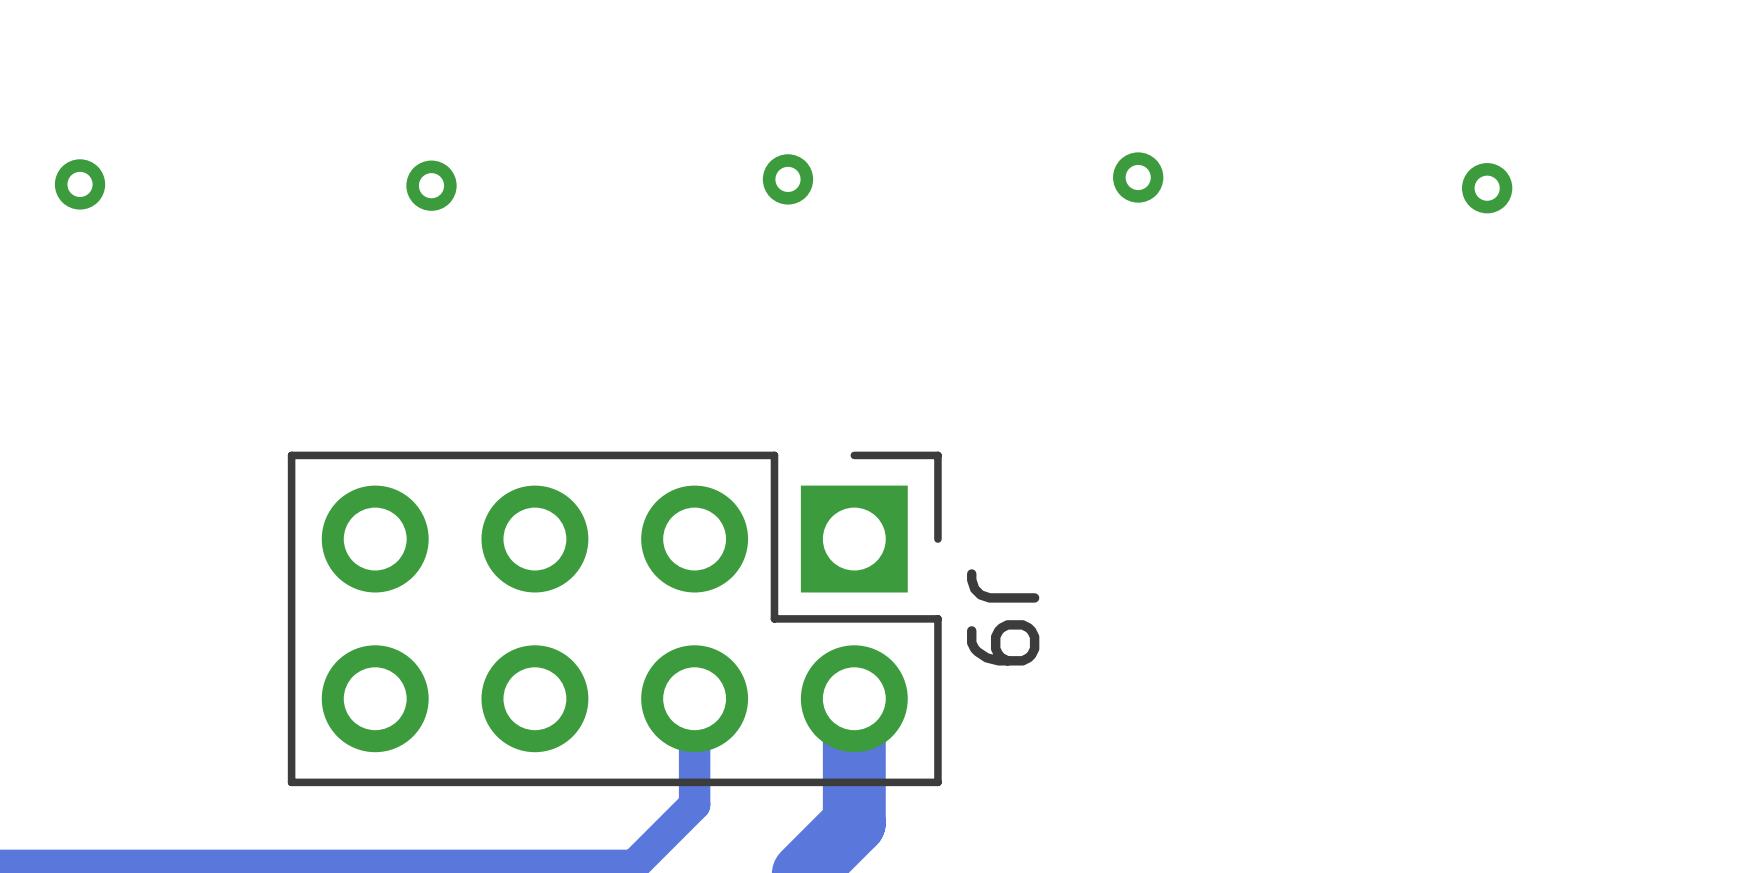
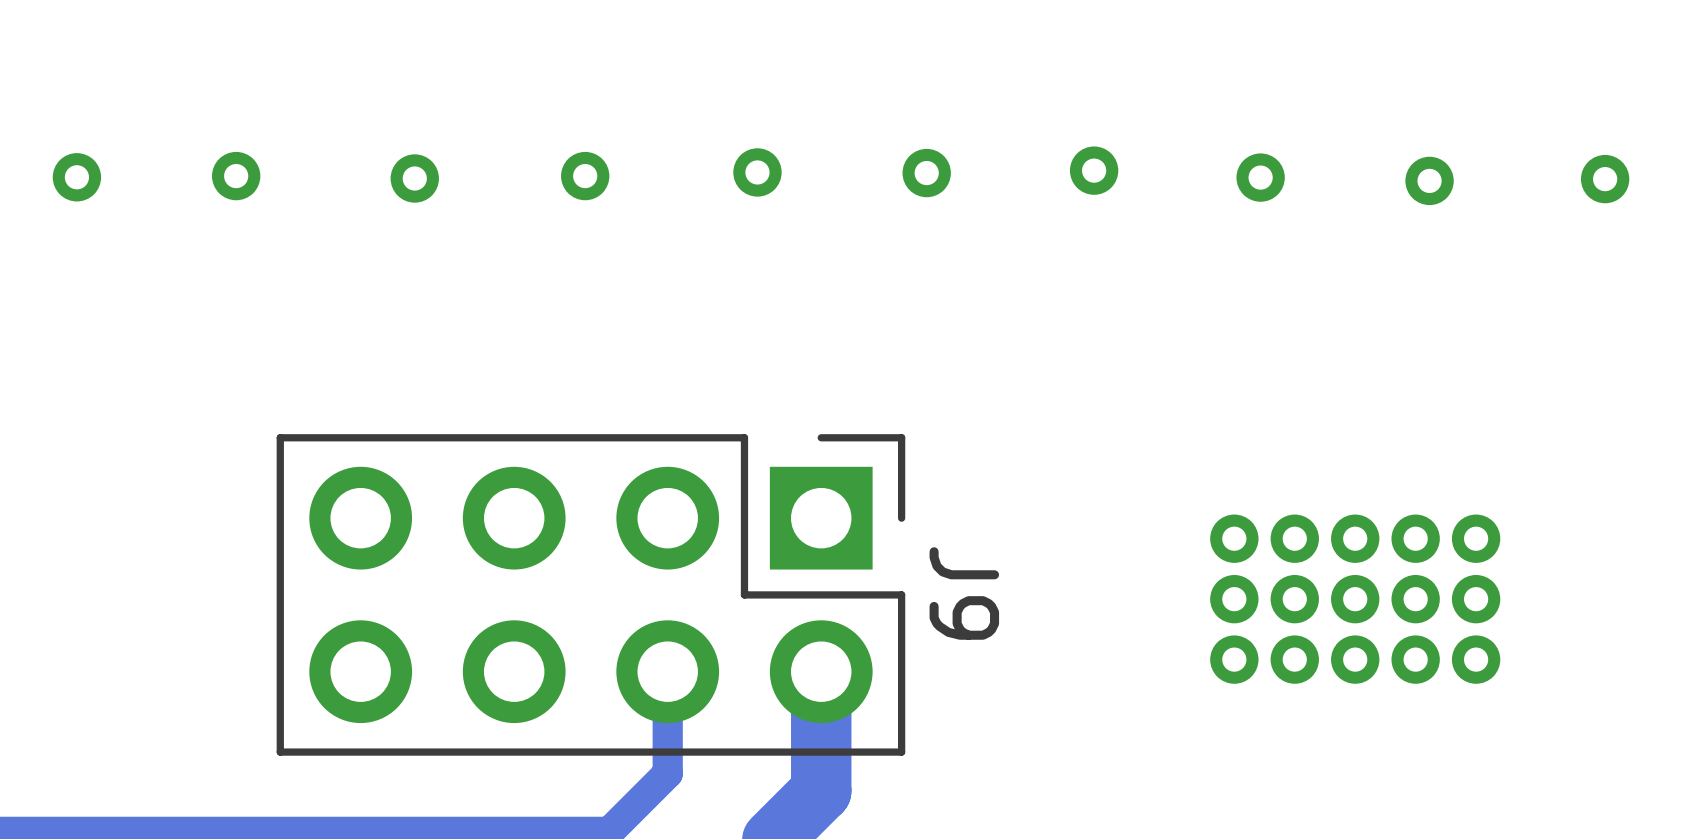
via: none -> (926, 173)
via: none -> (236, 176)
via: none -> (585, 176)
via: none -> (1260, 177)
via: none -> (1605, 179)
via: none -> (1234, 538)
via: none -> (1294, 538)
via: none -> (1355, 538)
via: none -> (1415, 538)
via: none -> (1476, 538)
via: none -> (1234, 599)
via: none -> (1294, 599)
via: none -> (1355, 599)
via: none -> (1415, 599)
via: none -> (1476, 599)
via: none -> (1234, 659)
via: none -> (1294, 659)
via: none -> (1355, 659)
via: none -> (1415, 659)
via: none -> (1476, 659)

